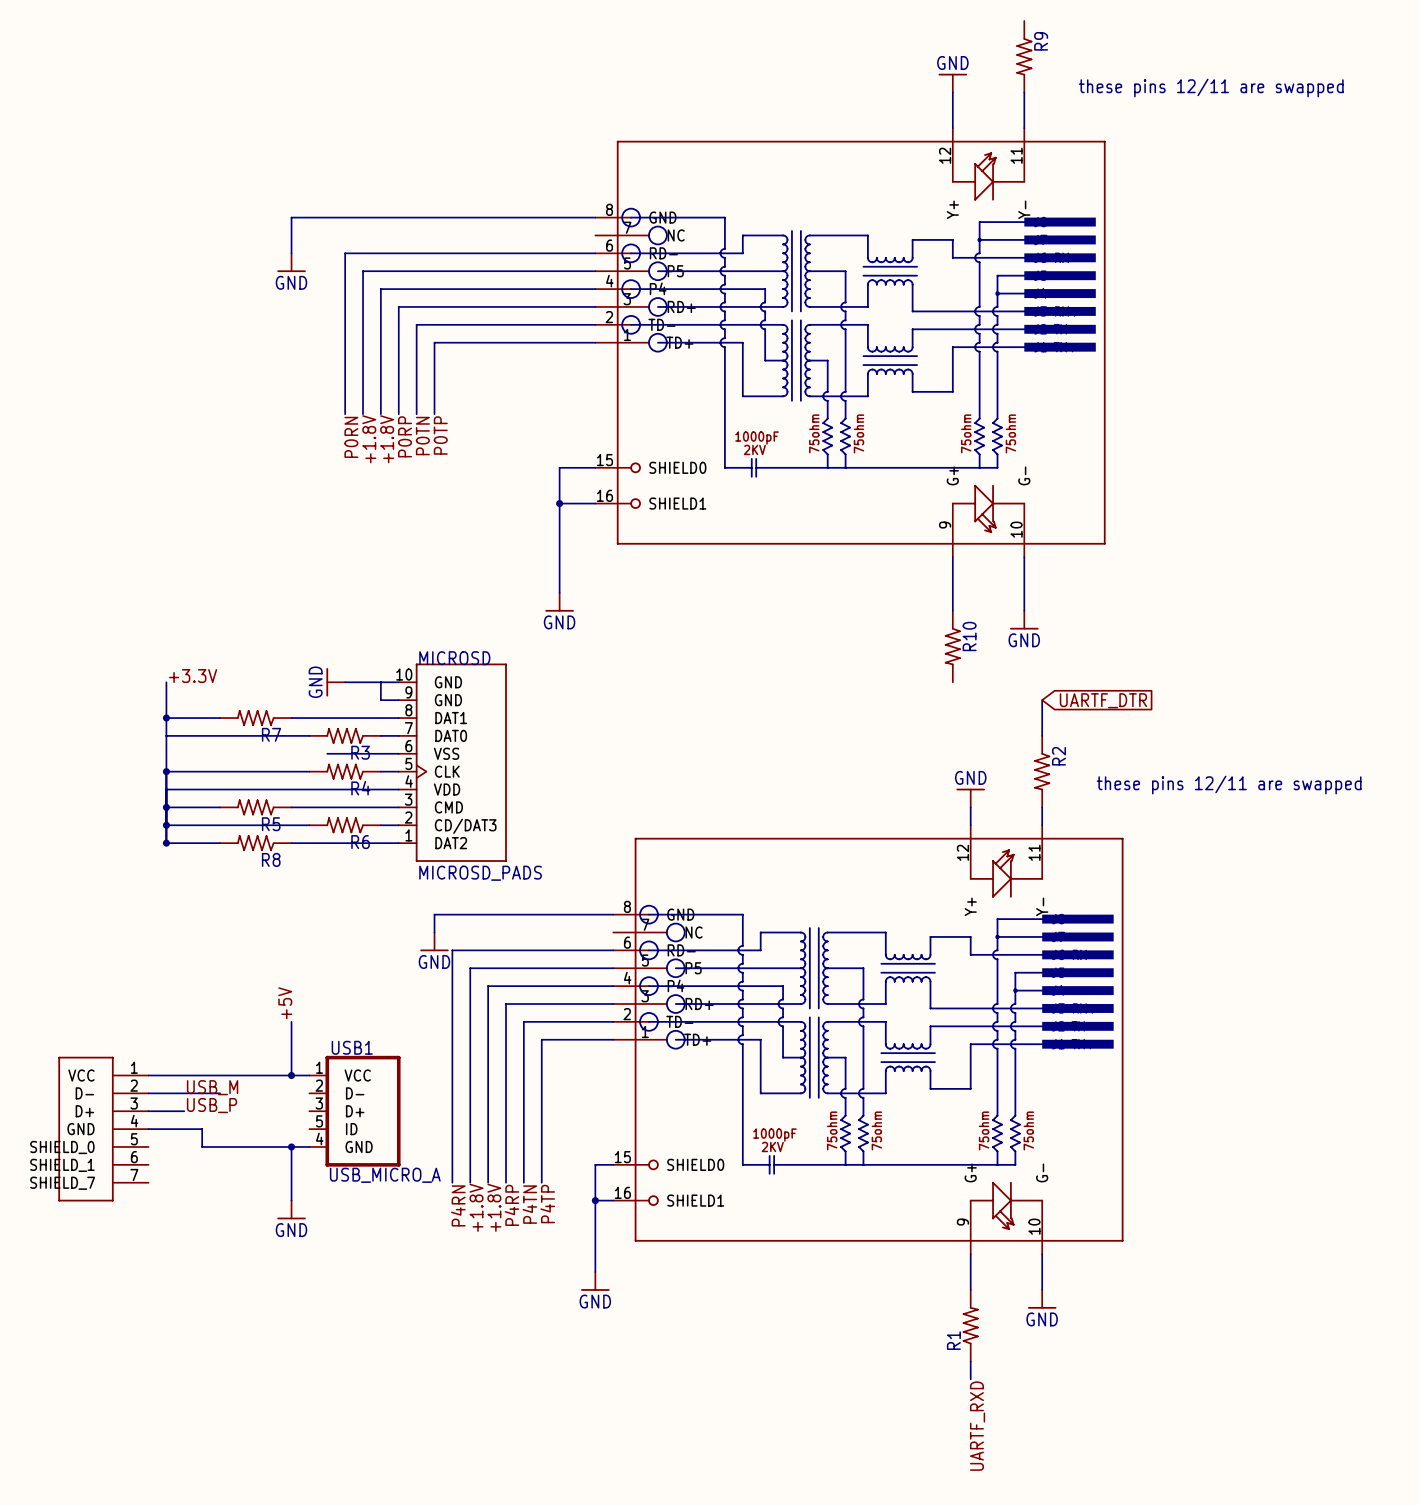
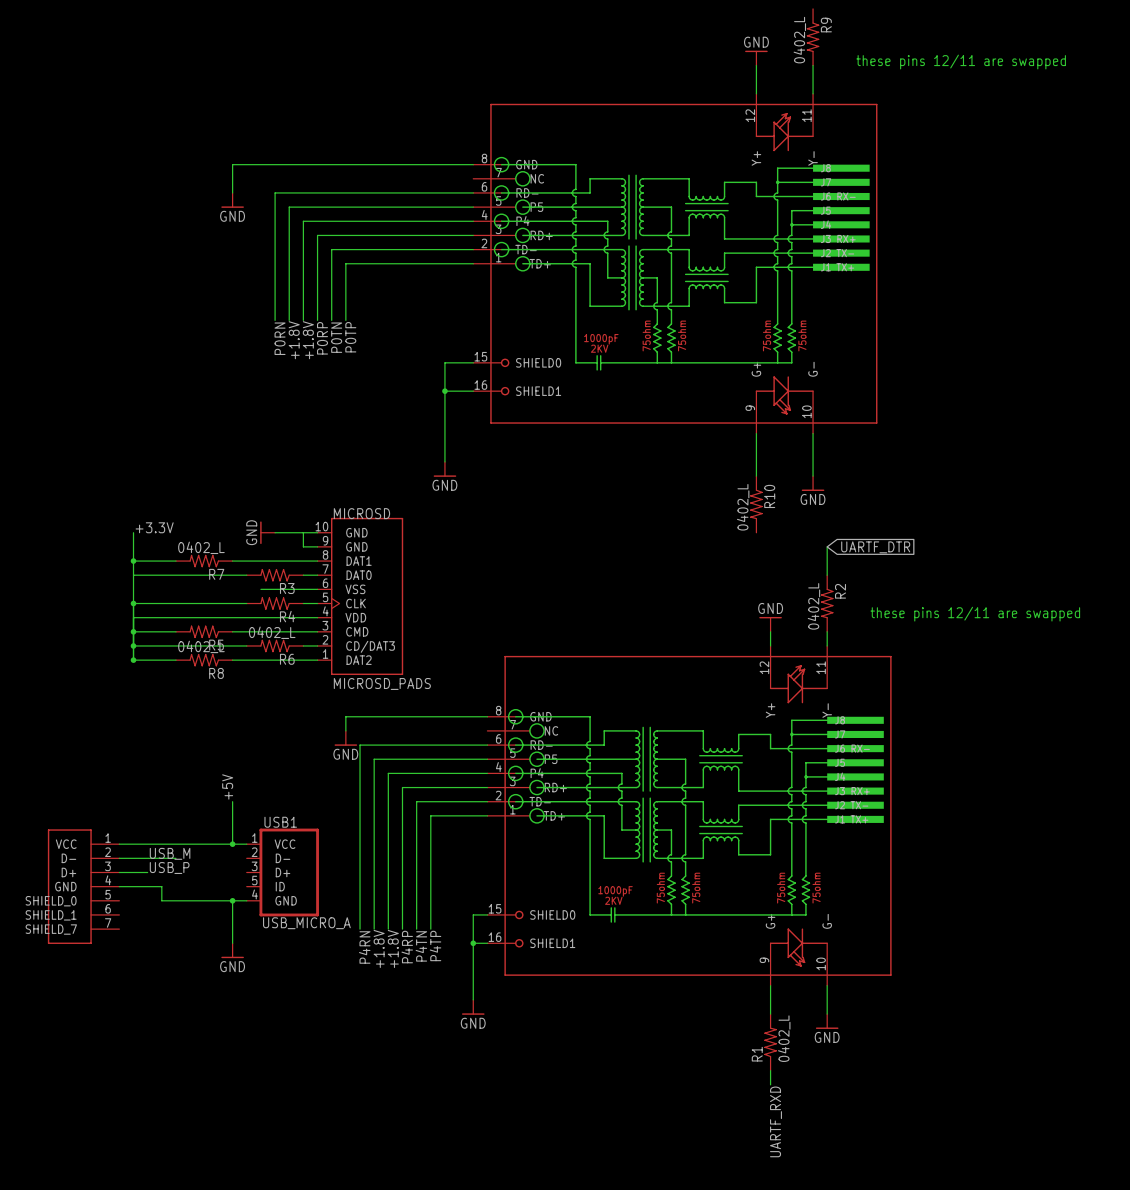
R9 value: none -> 0402_L (799, 40)
R10 value: none -> 0402_L (743, 507)
R7 value: none -> 0402_L (201, 547)
R2 value: none -> 0402_L (813, 606)
R6 value: none -> 0402_L (272, 632)
R8 value: none -> 0402_L (201, 646)
R1 value: none -> 0402_L (784, 1038)

